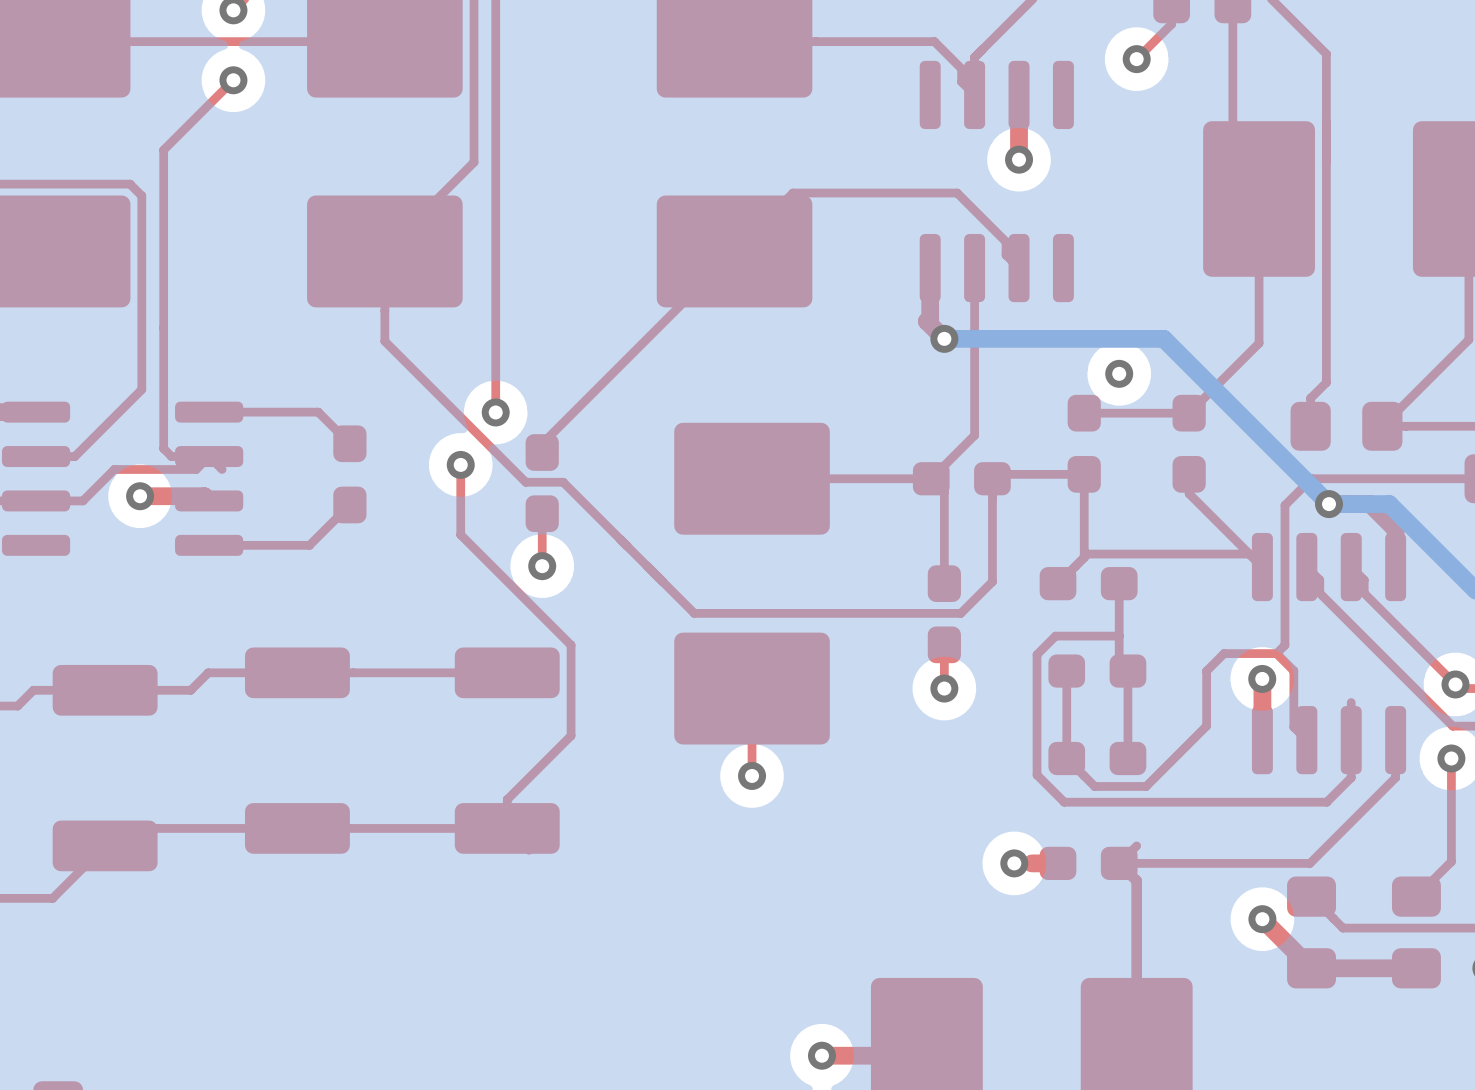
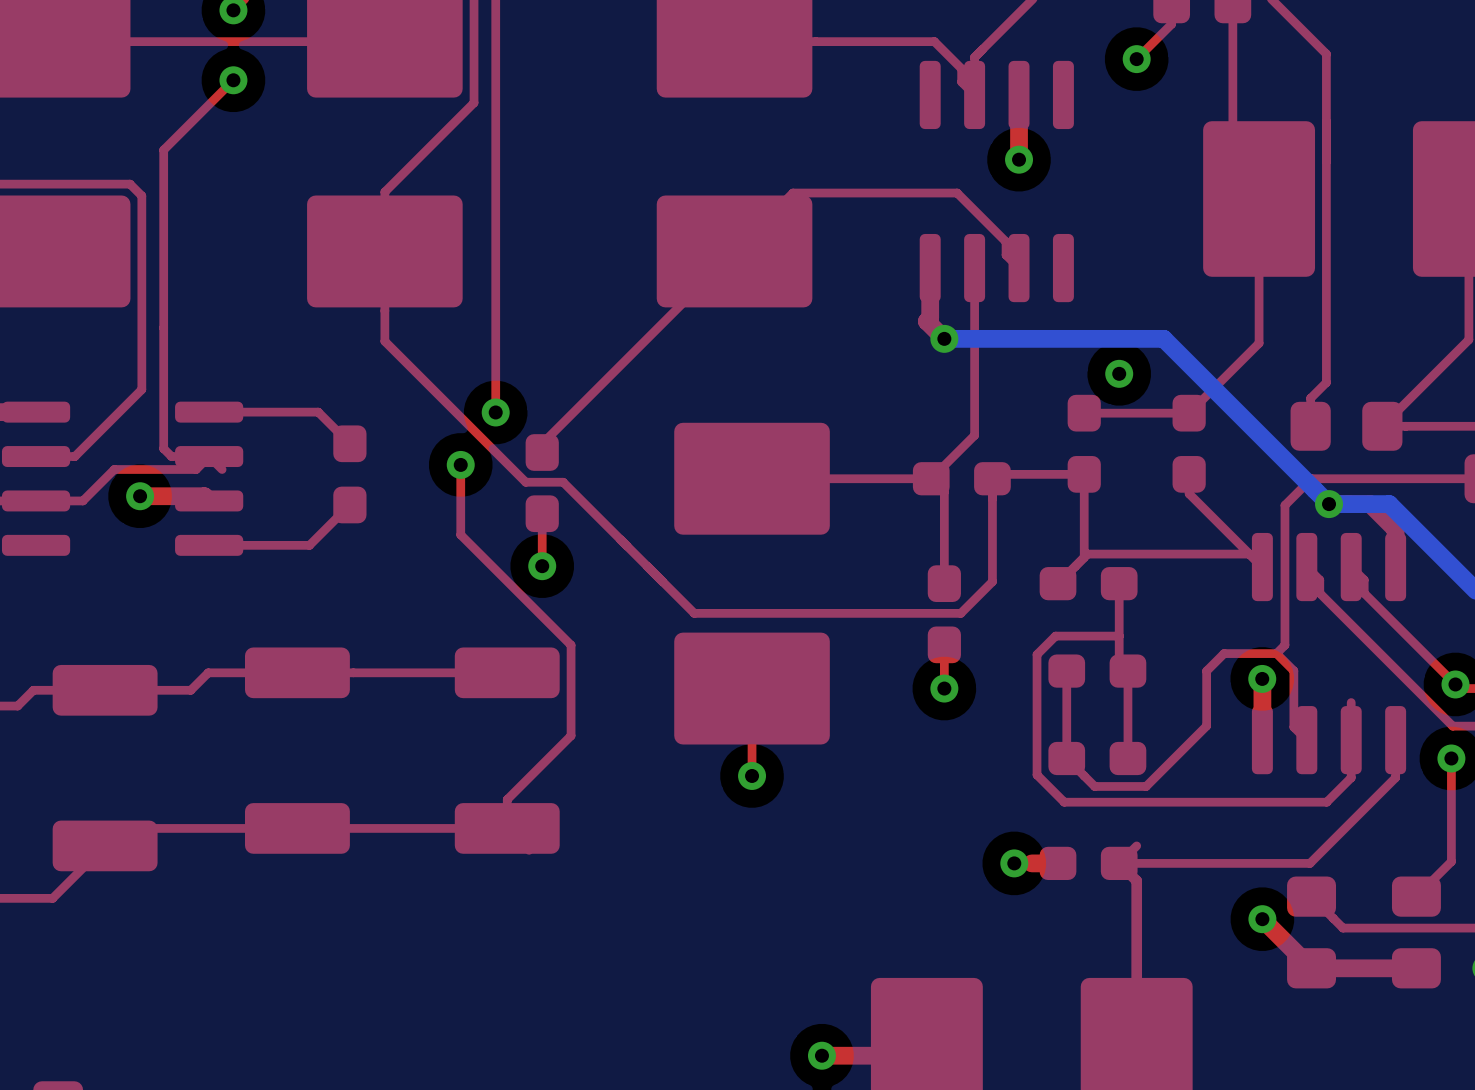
top track: (474, 102) (474, 162) (384, 251) -> (474, 102) (384, 192) (384, 251)

